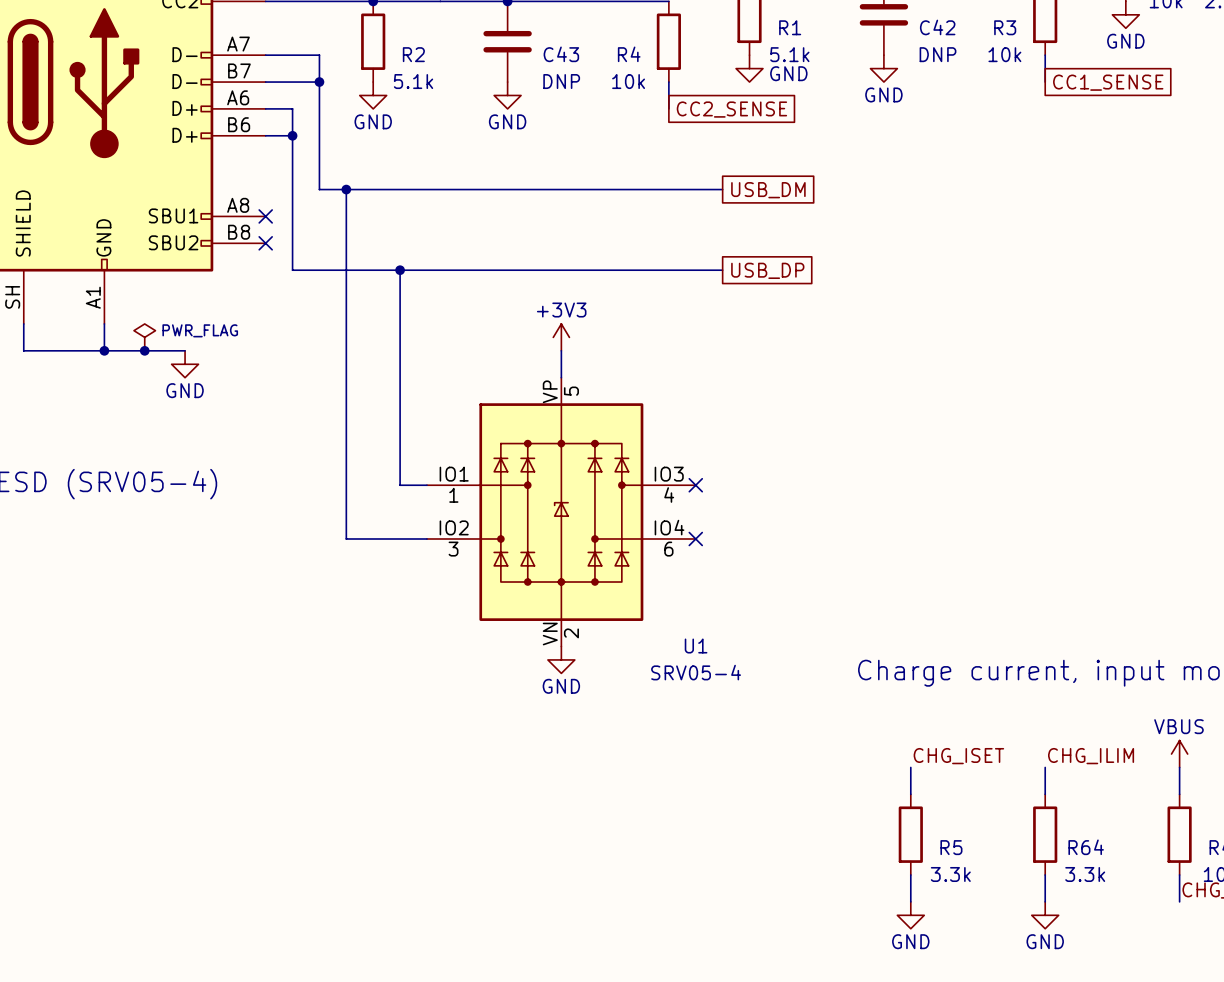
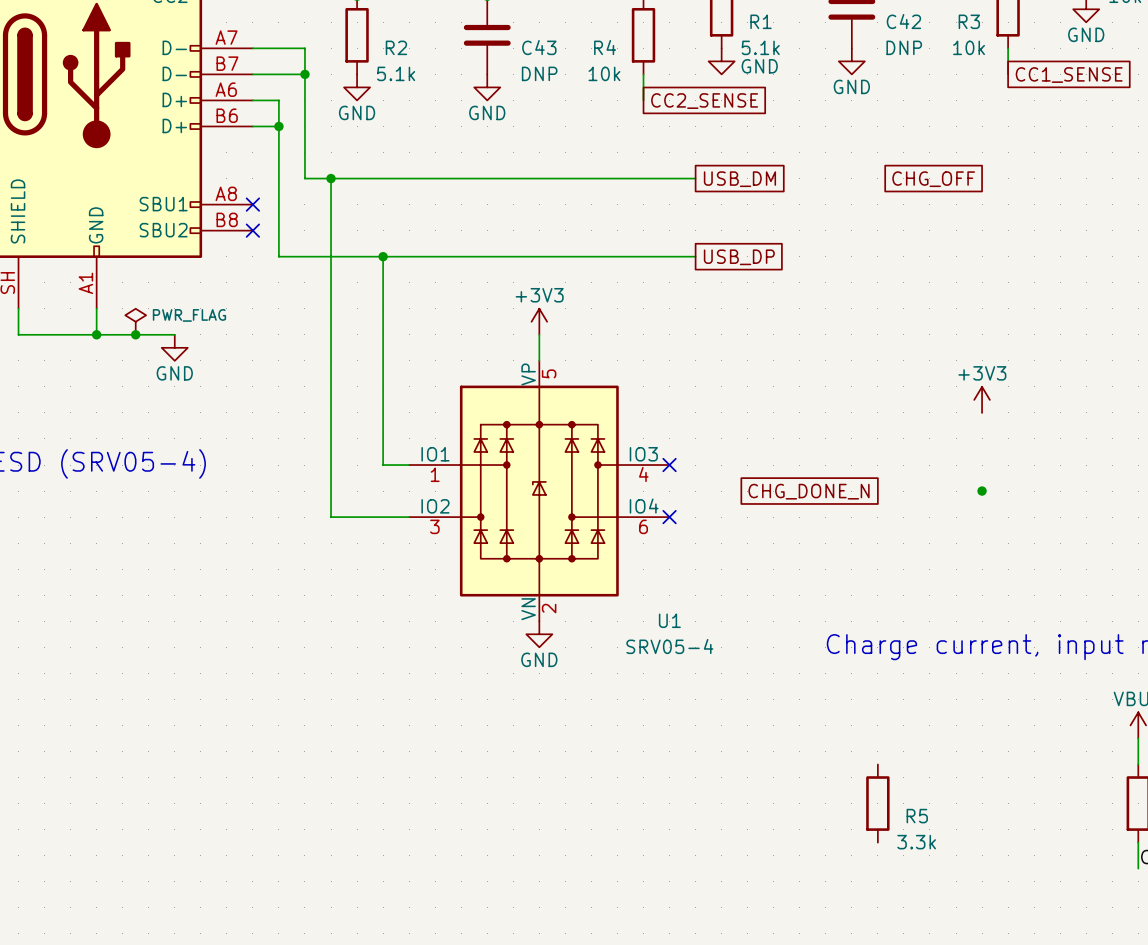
global label: none -> CHG_OFF (933, 179)
power symbol: none -> +3V3 (982, 399)
global label: none -> CHG_DONE_N (809, 491)
junction: none -> (982, 491)
label: CHG_ISET (958, 756) -> none
label: CHG_ILIM (1091, 756) -> none
wire: (910, 767) (910, 794) -> none
wire: (1045, 767) (1045, 794) -> none
R64: 3.3k (1045, 834) -> none
wire: (910, 874) (910, 901) -> none
wire: (1045, 874) (1045, 901) -> none
power symbol: GND (910, 915) -> none
power symbol: GND (1045, 915) -> none

